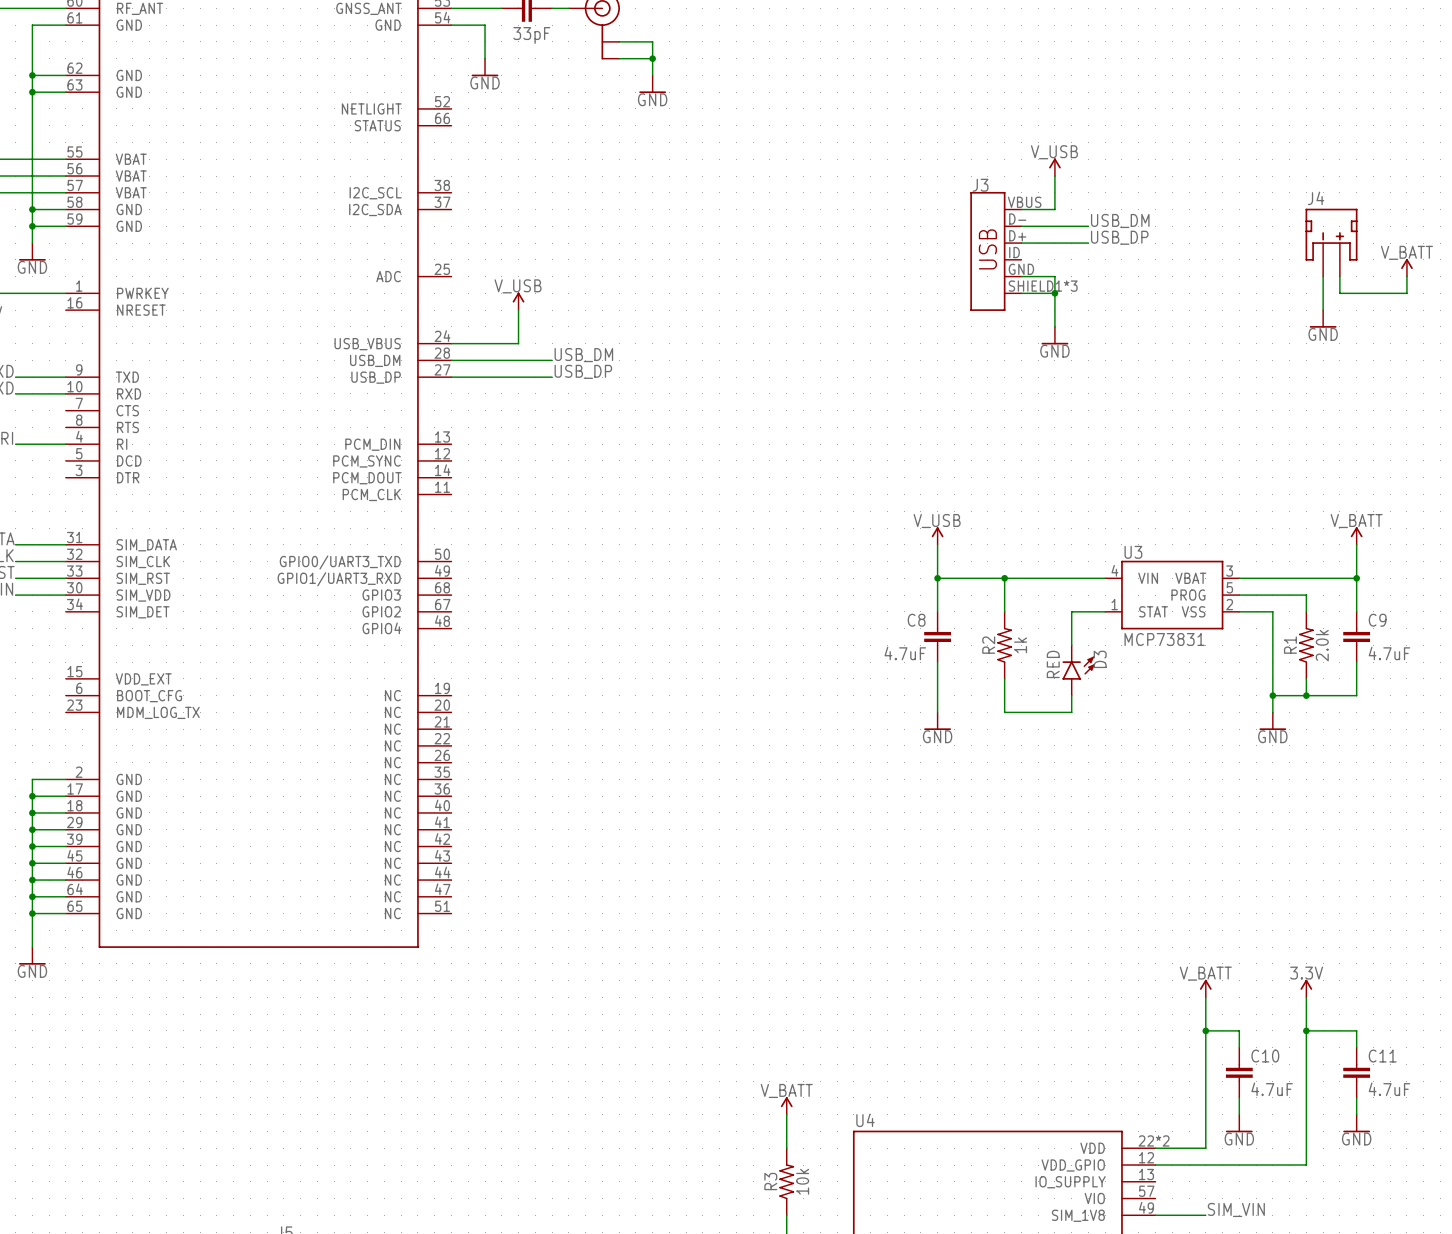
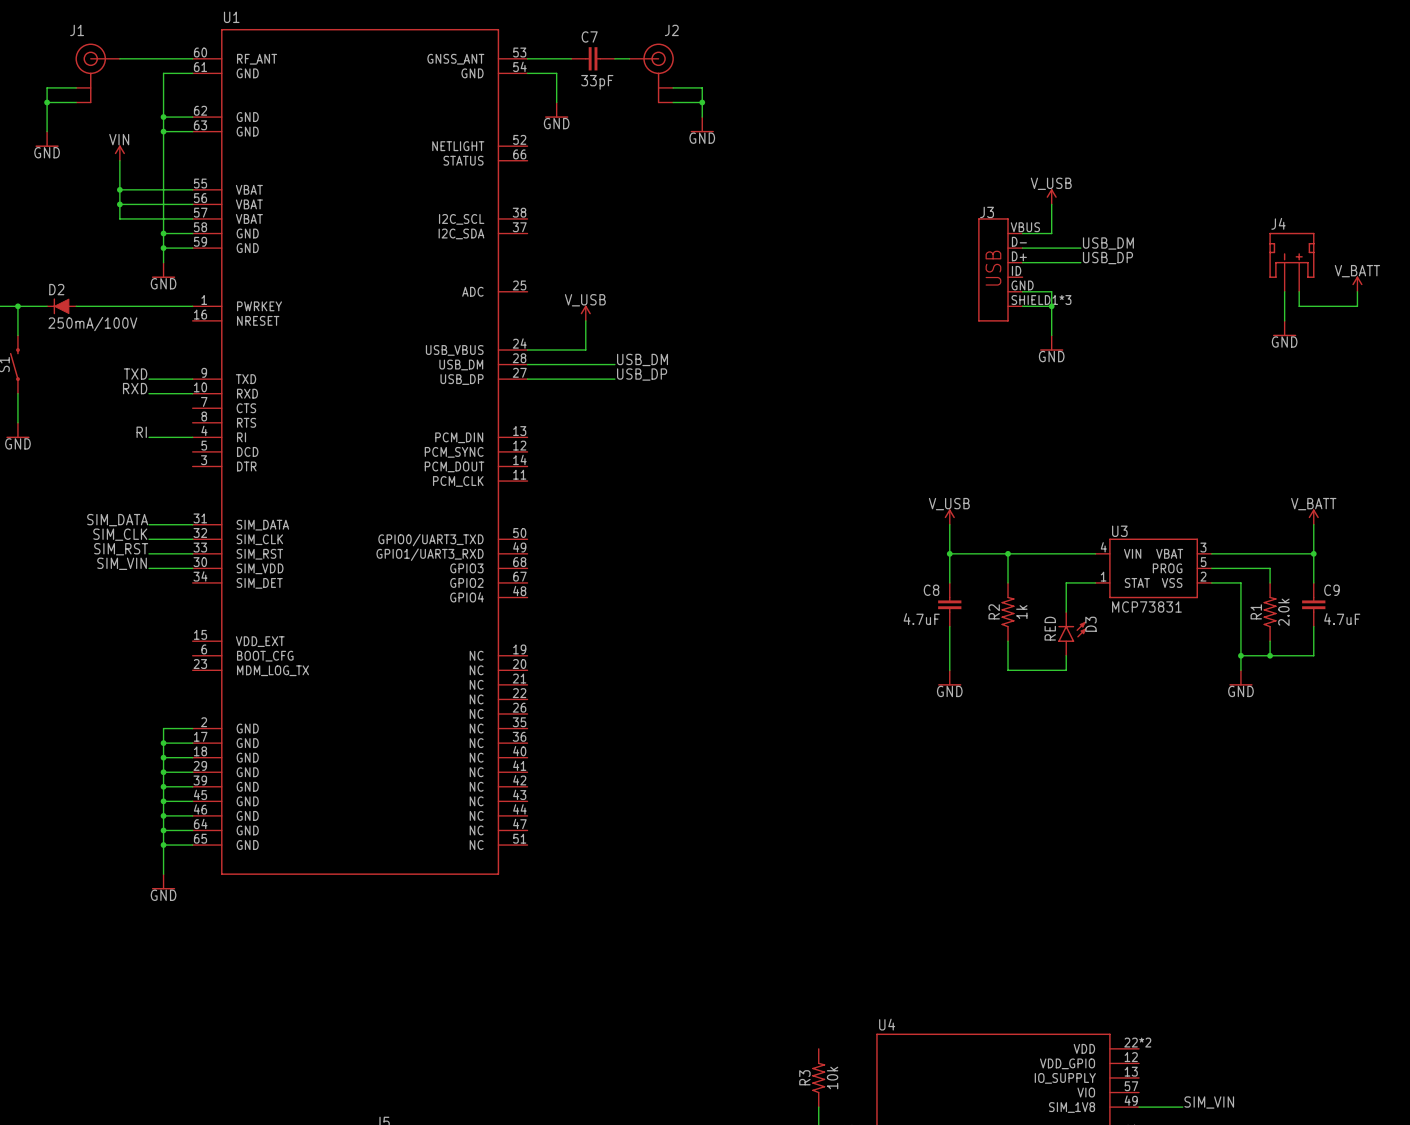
power symbol: V_BATT (1205, 988) -> none
power symbol: 3.3V (1306, 988) -> none
wire: (1205, 997) (1205, 1148) (1155, 1148) -> none
wire: (1306, 997) (1306, 1165) (1155, 1165) -> none
wire: (1205, 1030) (1239, 1030) (1239, 1047) -> none
junction: (1205, 1030) -> none
wire: (1306, 1030) (1356, 1030) (1356, 1047) -> none
junction: (1306, 1030) -> none
C10: 4.7uF (1239, 1072) -> none
C11: 4.7uF (1356, 1072) -> none
wire: (1239, 1097) (1239, 1114) -> none
wire: (1356, 1097) (1356, 1114) -> none
power symbol: V_BATT (786, 1105) -> none
wire: (786, 1114) (786, 1148) -> none
power symbol: GND (1239, 1123) -> none
power symbol: GND (1356, 1123) -> none

